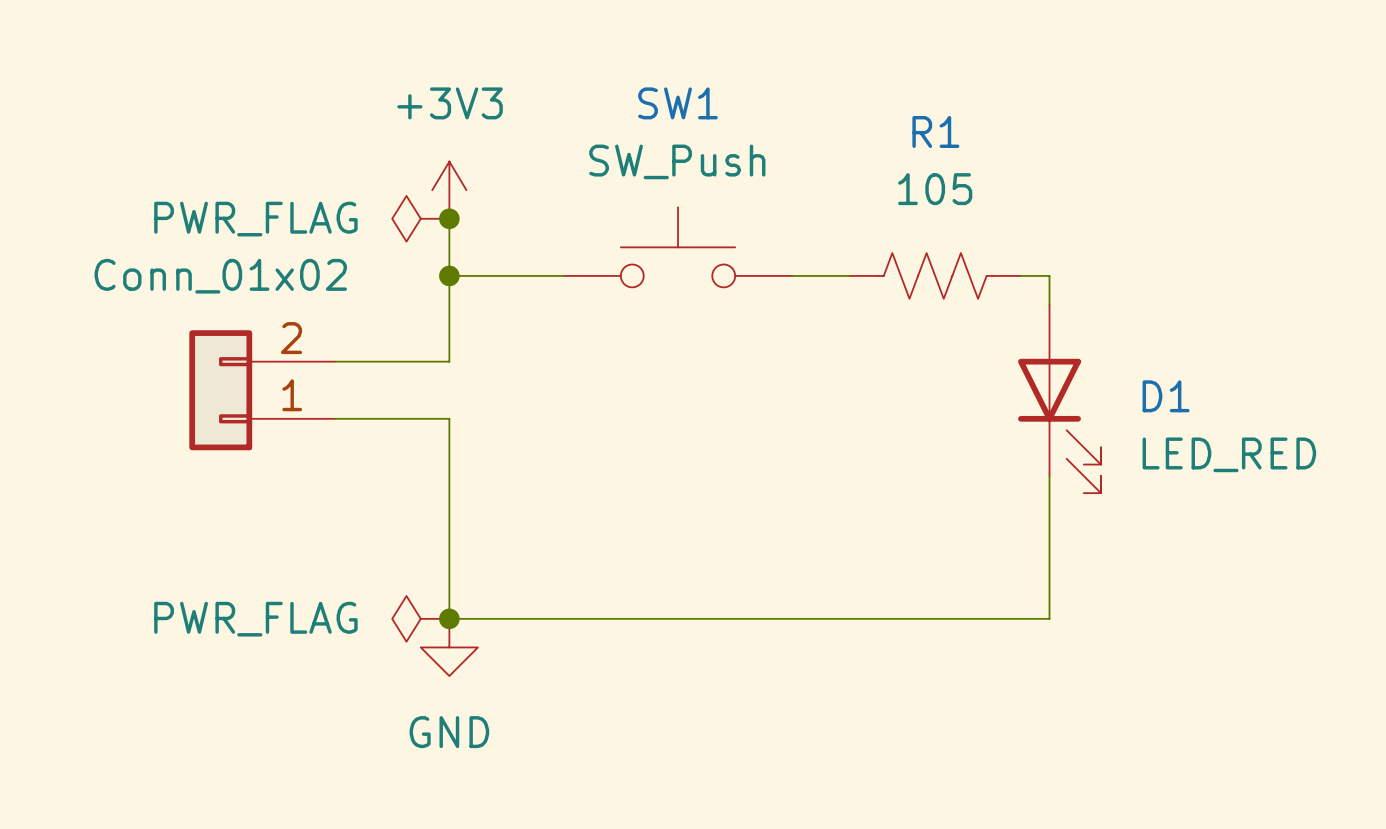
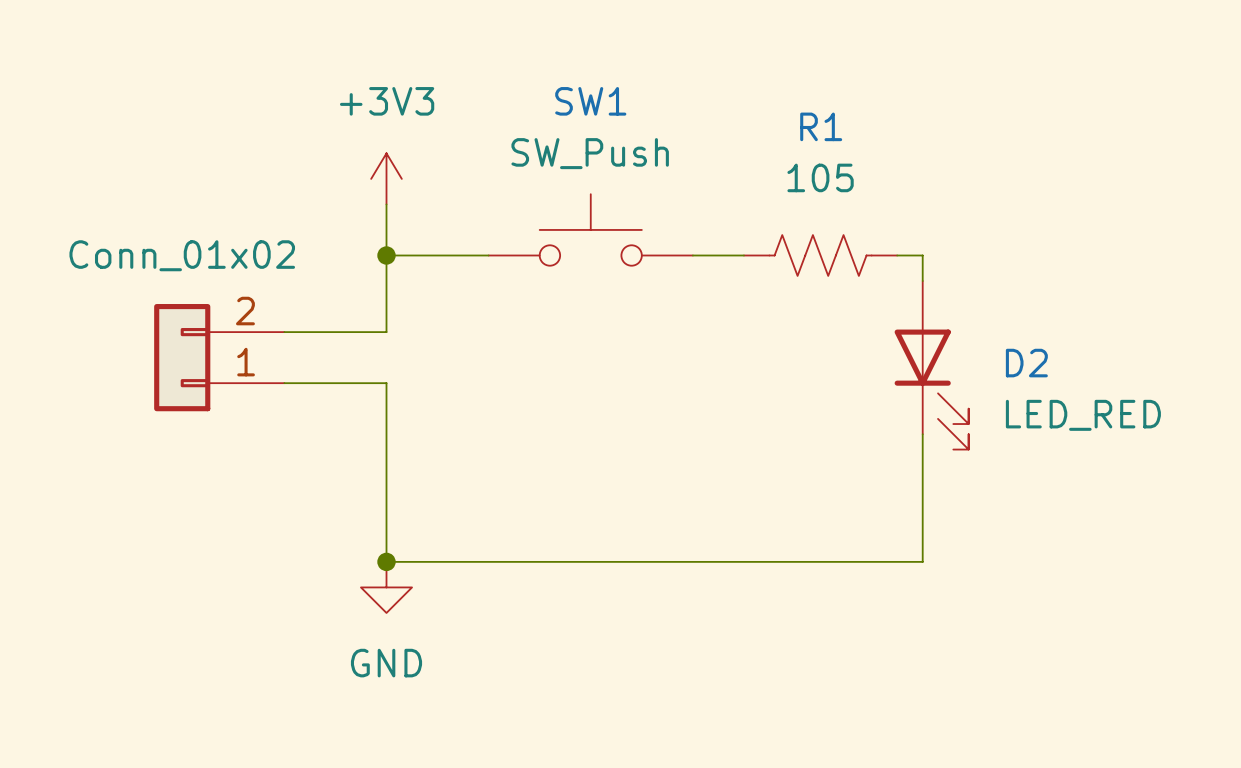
power symbol: PWR_FLAG (420, 218) -> none
junction: (449, 218) -> none
D1 name: D1 (1166, 396) -> D2 (1026, 363)
power symbol: PWR_FLAG (420, 618) -> none

